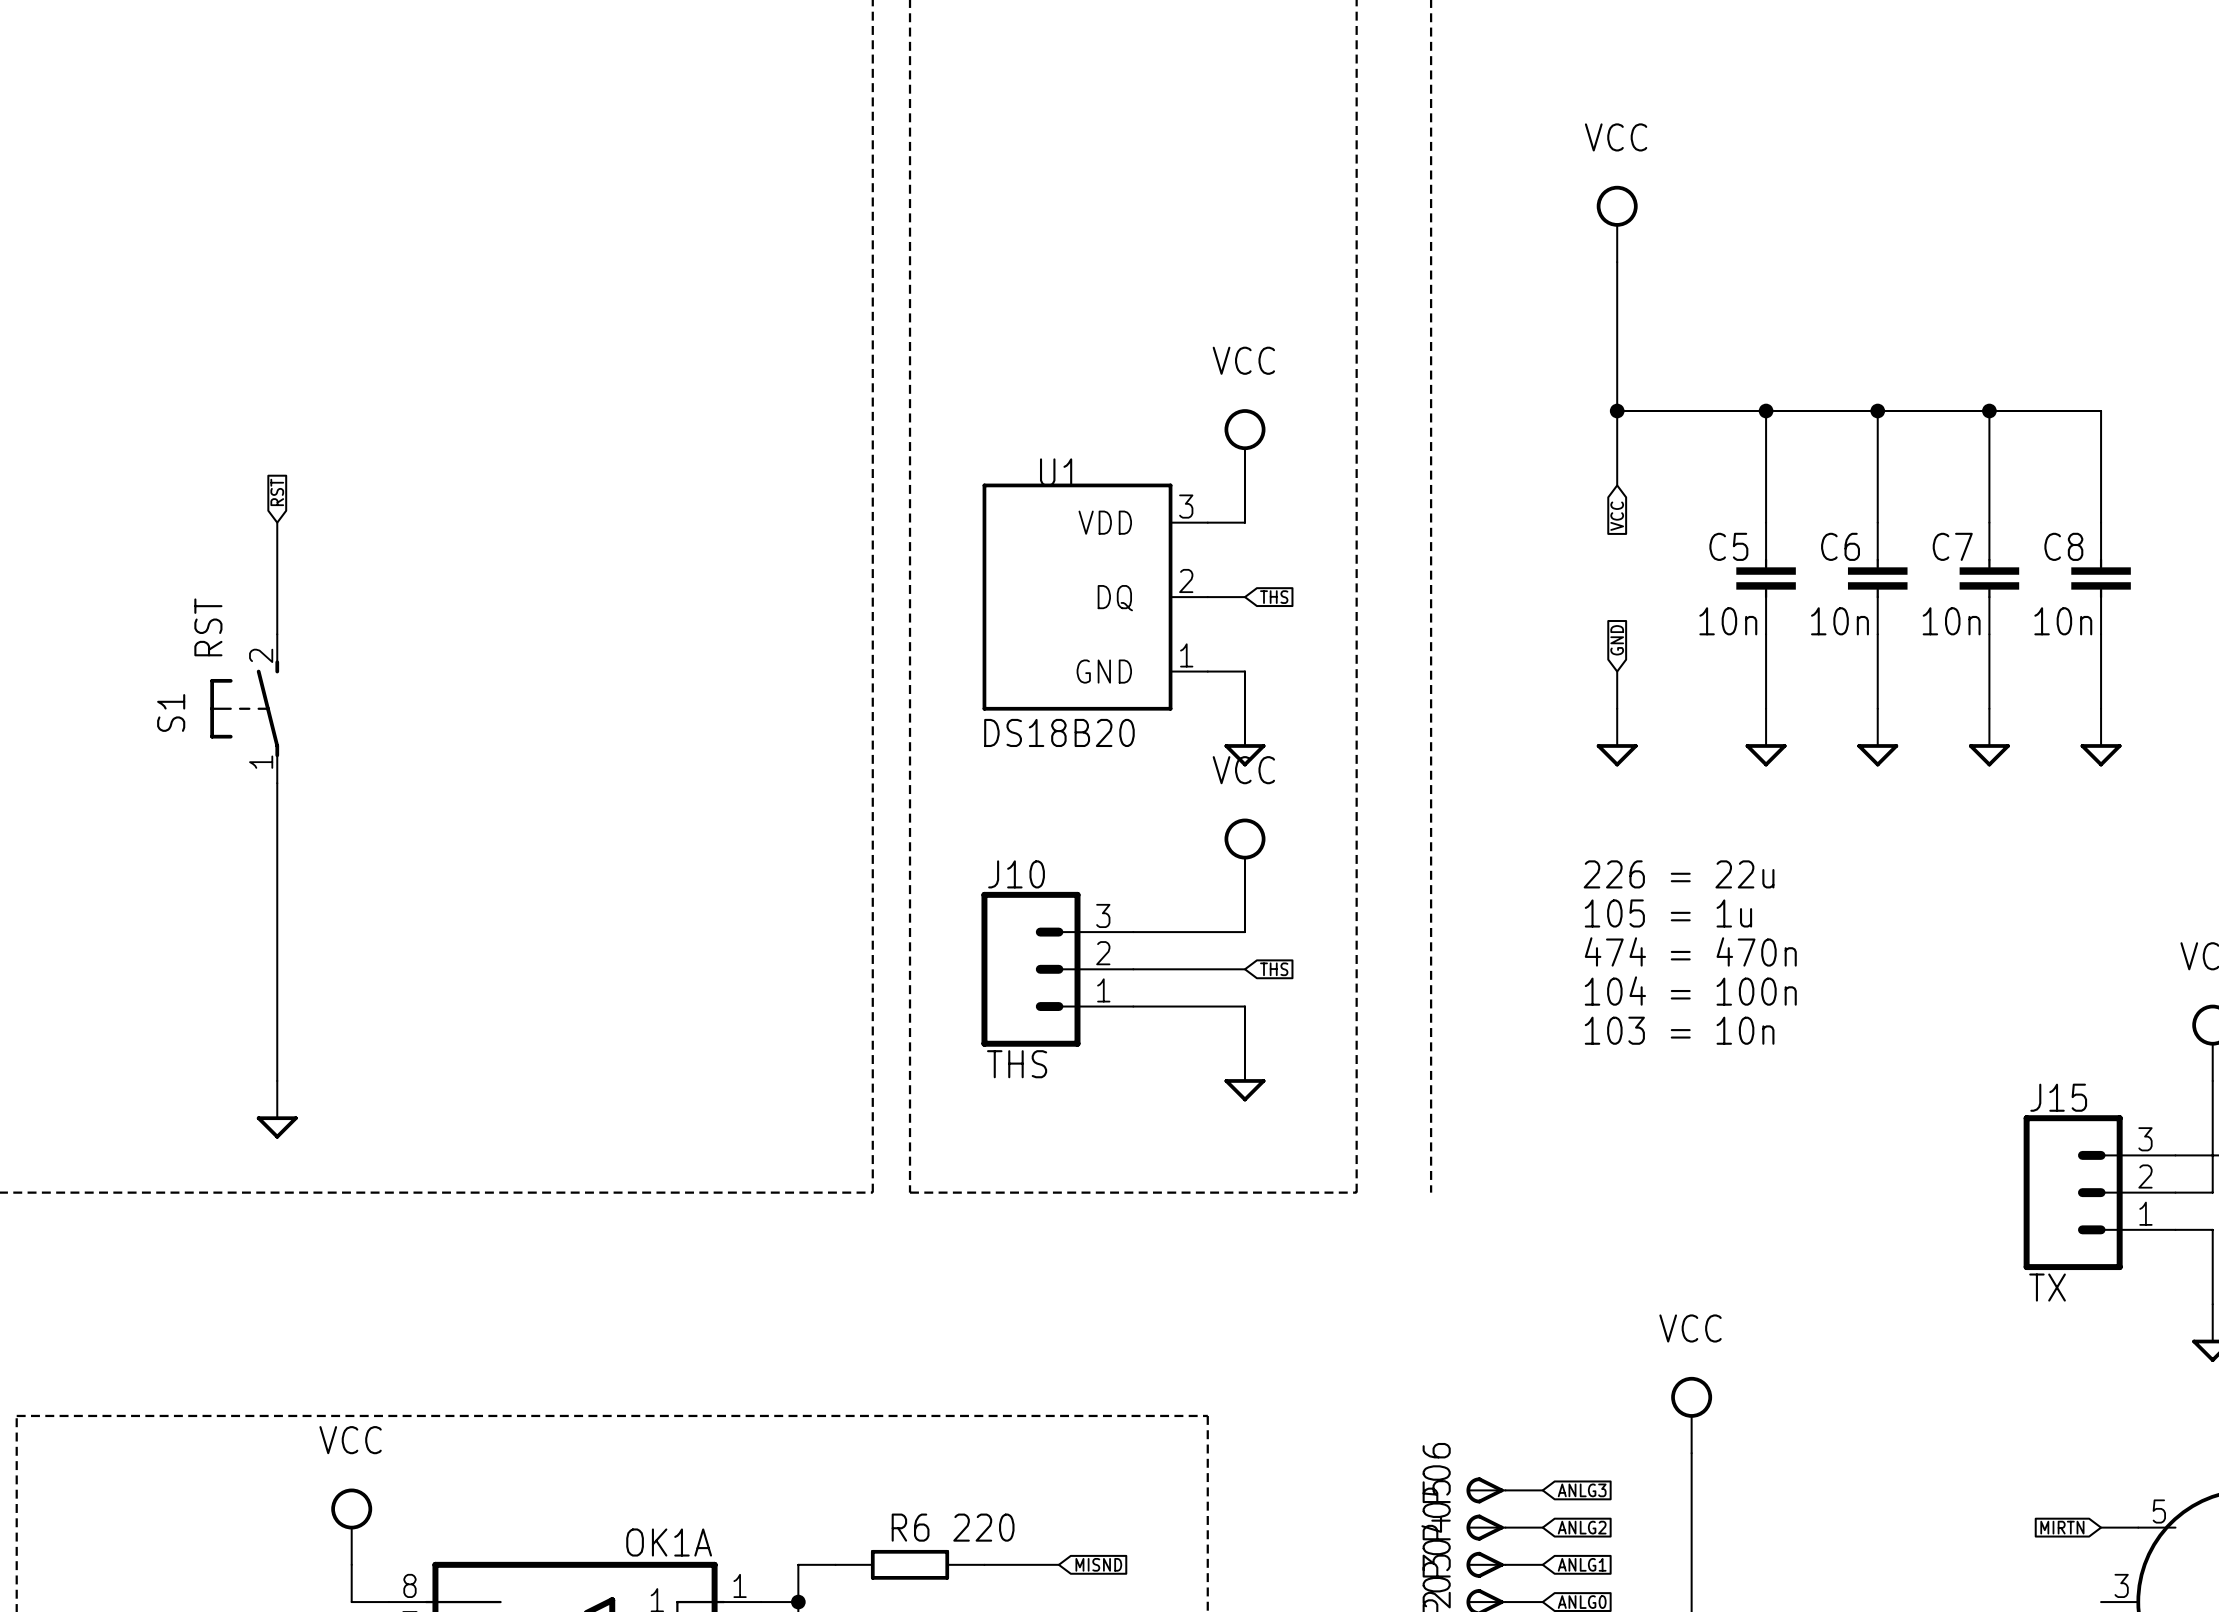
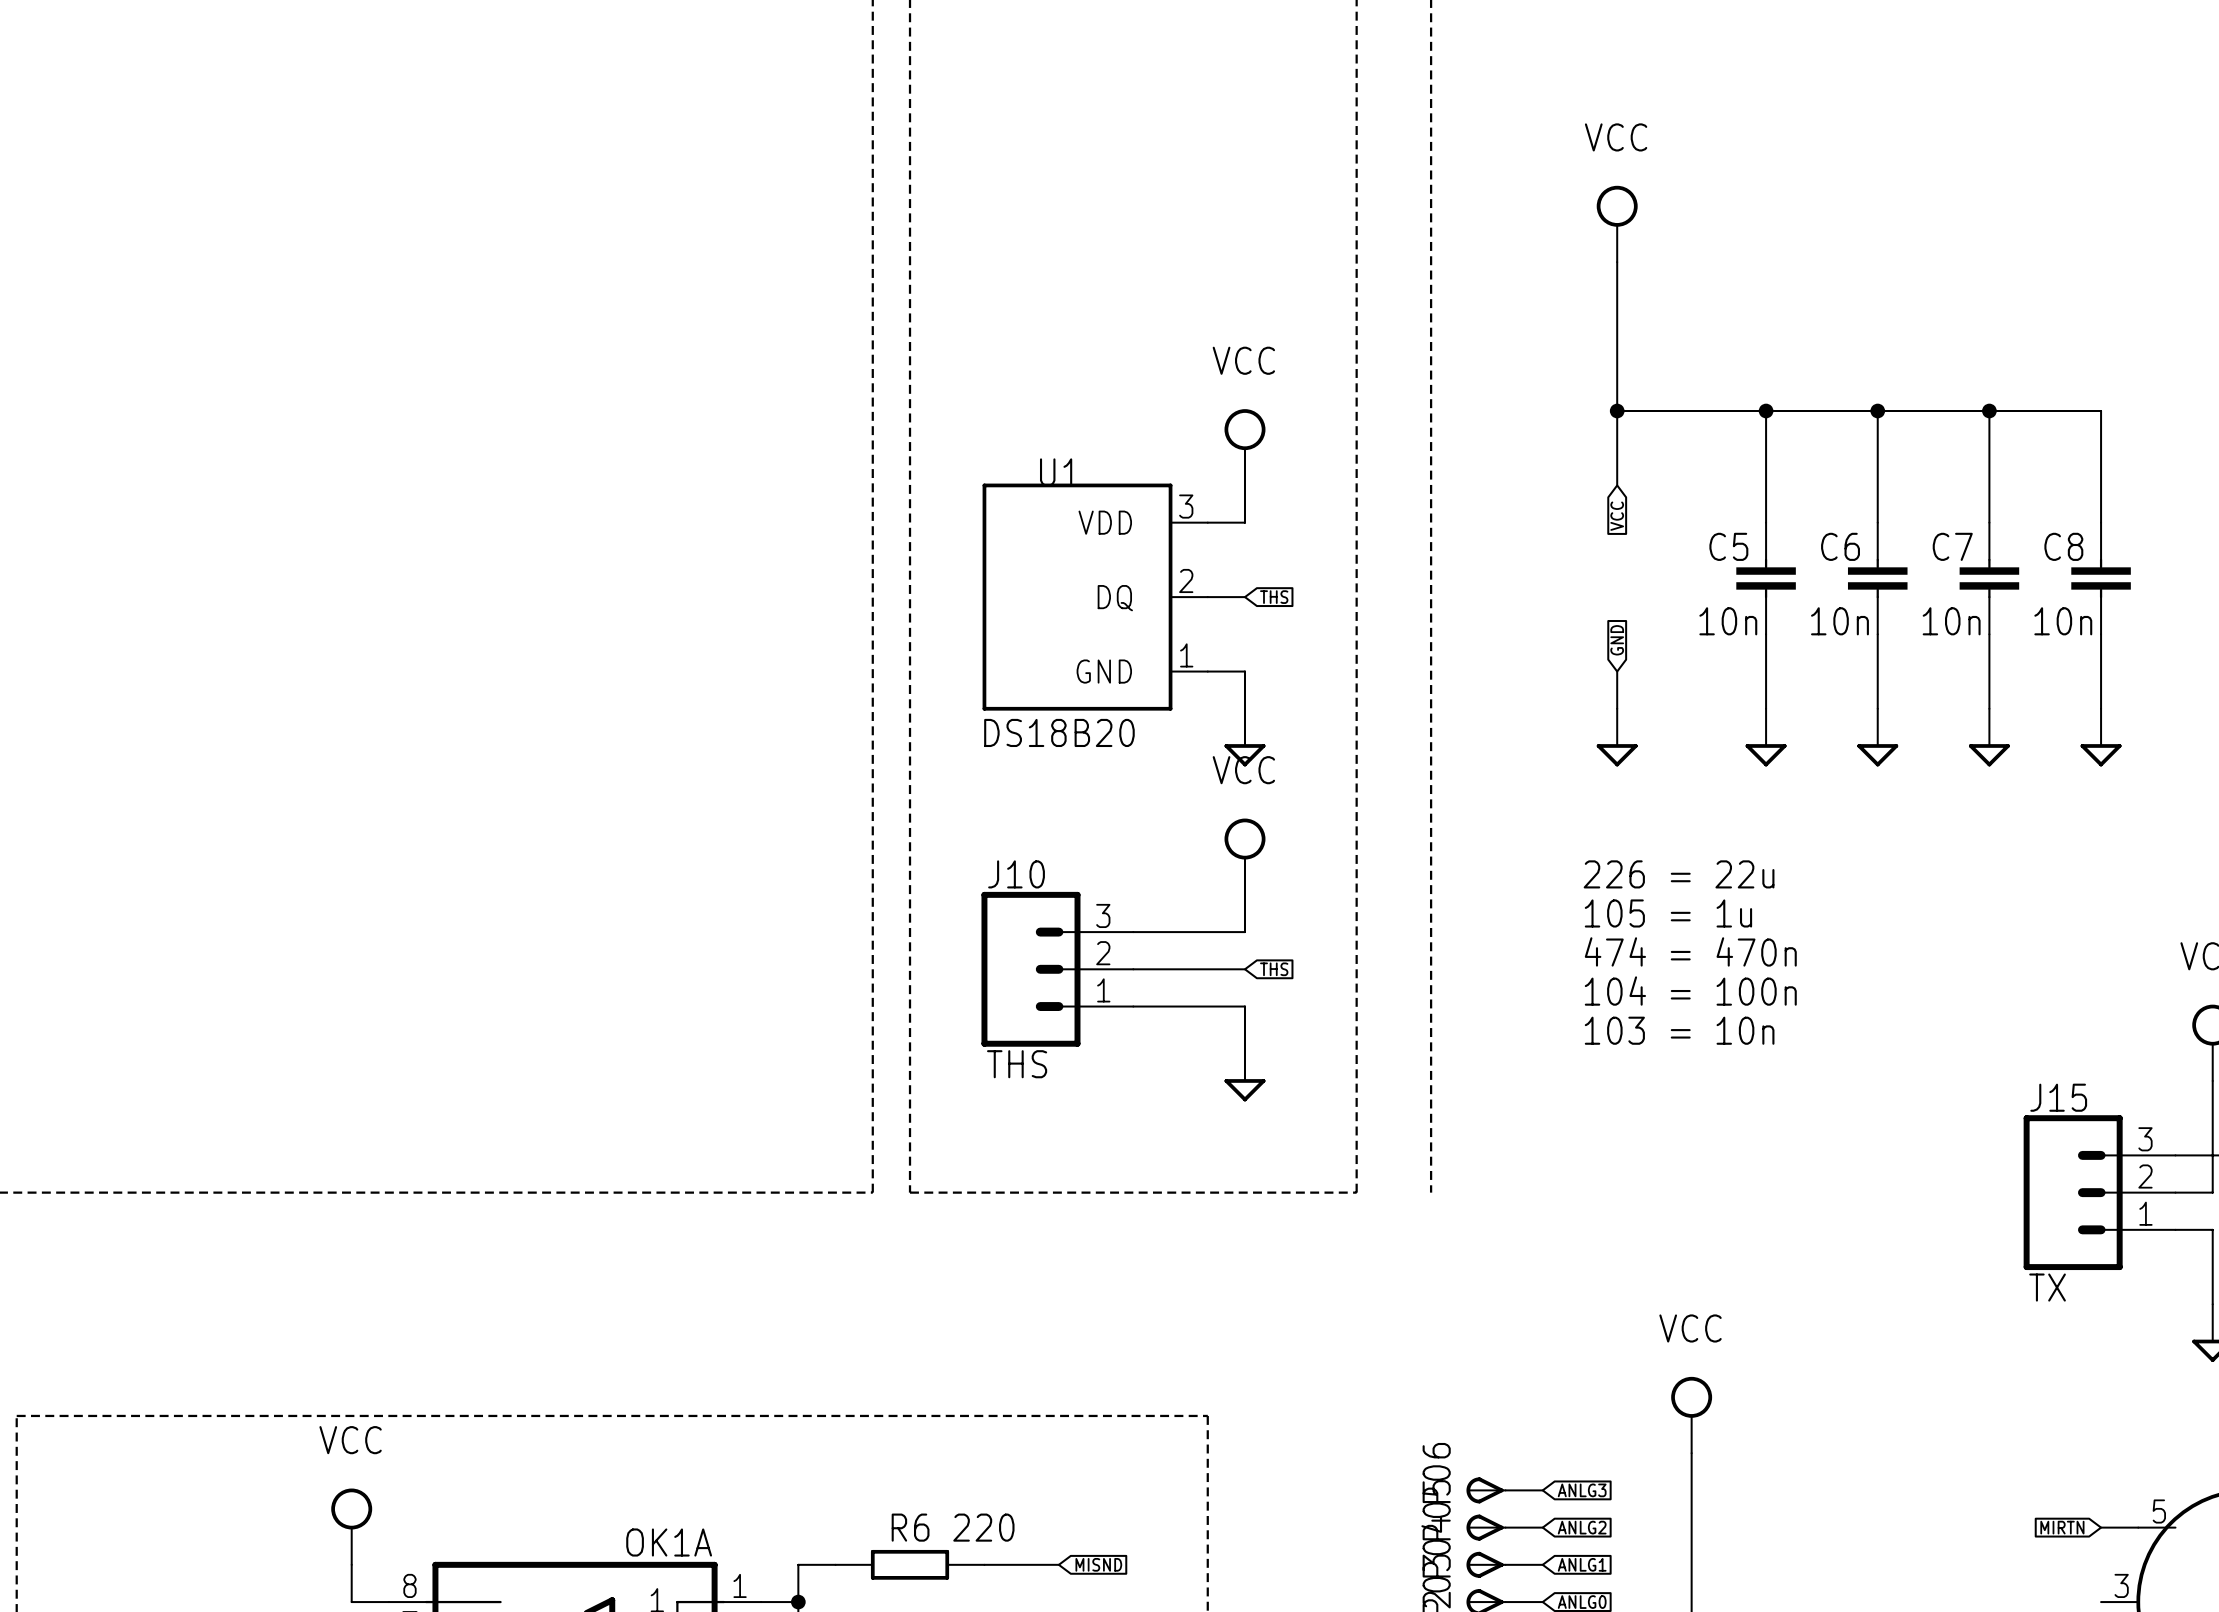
global label: RST (277, 492) -> none
wire: (277, 522) (277, 634) -> none
S1: RST (244, 708) -> none
wire: (277, 783) (277, 1080) -> none
power symbol: (277, 1109) -> none

